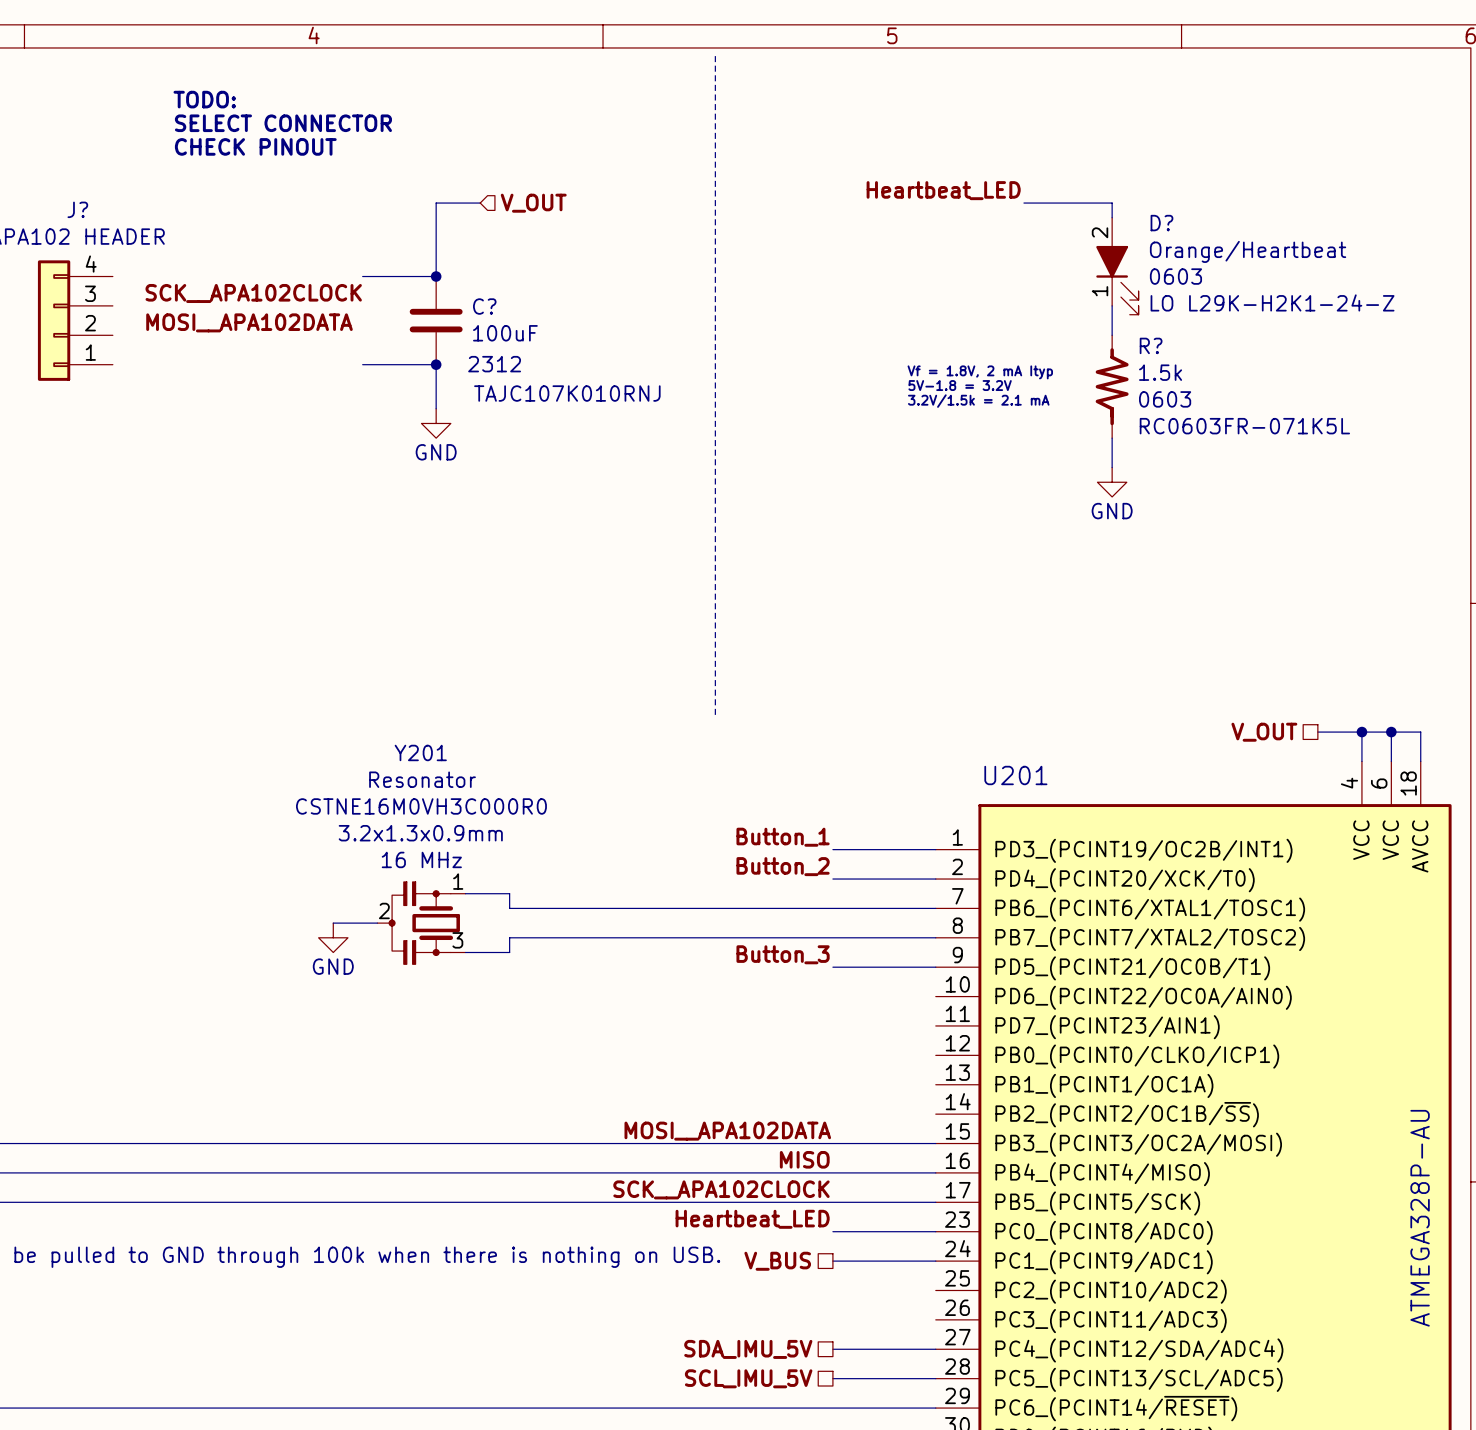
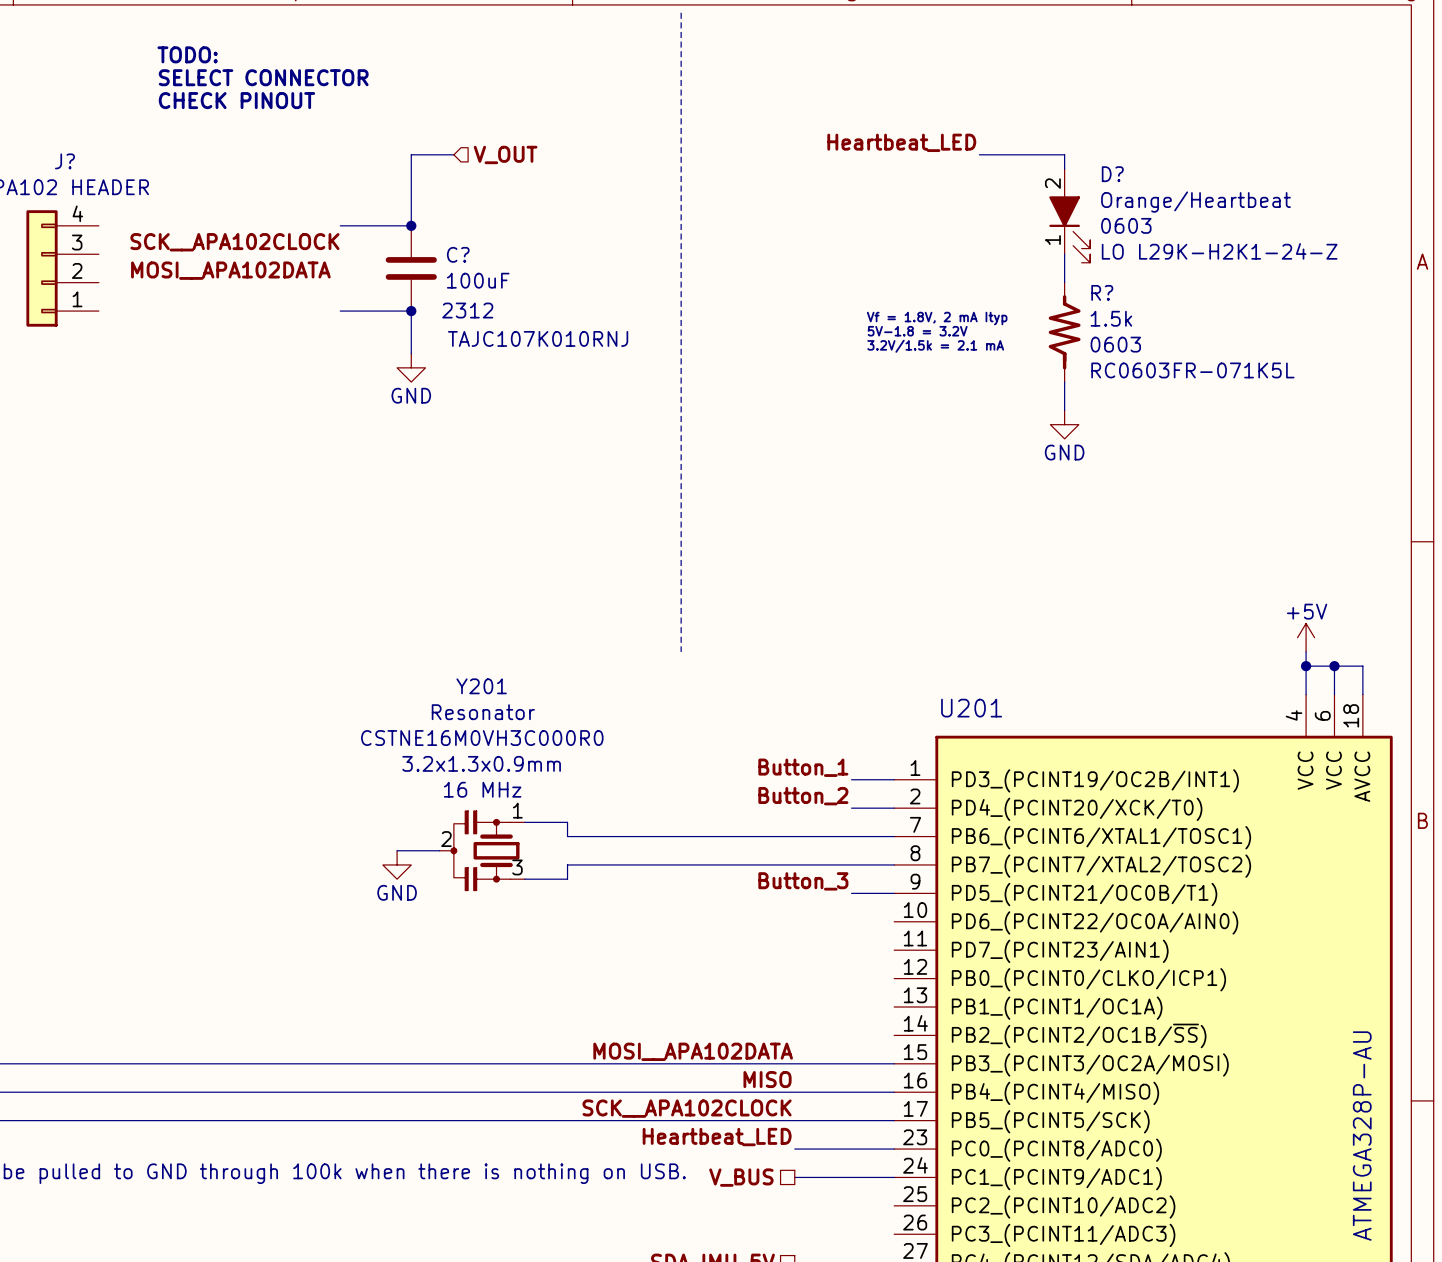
power symbol: none -> +5V (1306, 637)
hierarchical label: V_OUT (1264, 732) -> none
wire: (1317, 732) (1361, 732) -> (1306, 651) (1306, 666)
label position: Button_1 (783, 837) -> Button_1 (803, 767)
wire: (832, 849) (891, 849) -> none
label position: Button_2 (783, 866) -> Button_2 (803, 796)
wire: (832, 879) (891, 879) -> none
wire: (465, 893) (509, 893) (509, 908) (597, 908) -> (524, 822) (567, 822) (567, 836)
wire: (333, 923) (377, 923) -> (397, 850) (439, 850)
Y201 position: (421, 923) -> (482, 850)
power symbol position: GND (333, 937) -> GND (397, 864)
wire: (597, 937) (509, 937) (509, 952) (465, 952) -> (567, 864) (567, 879) (524, 879)
label position: Button_3 (783, 954) -> Button_3 (803, 881)
wire: (832, 967) (891, 967) -> none

